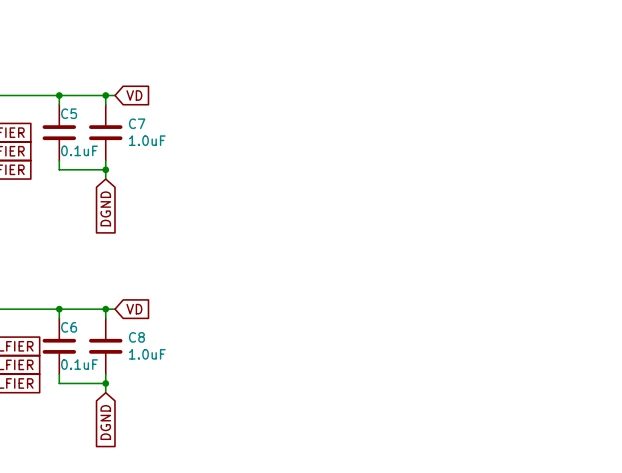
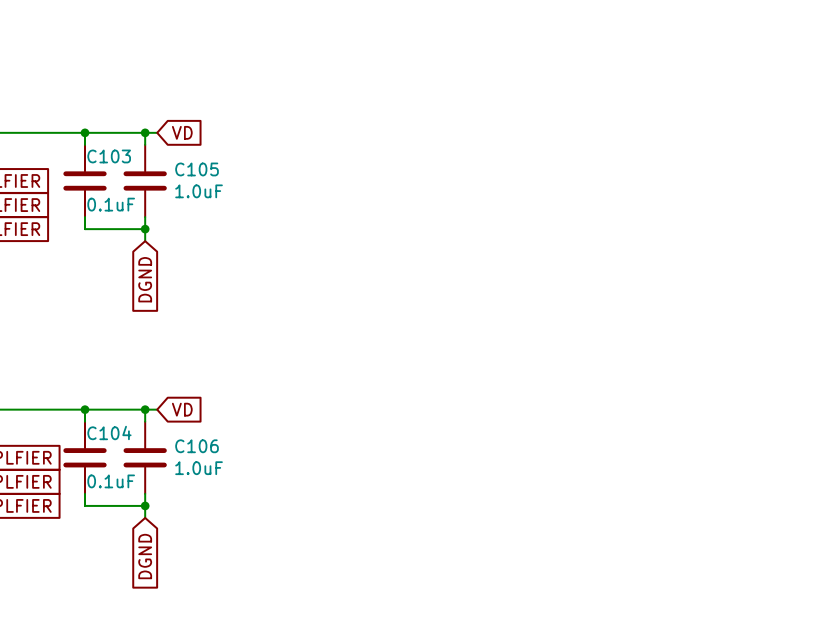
C5 name: C5 (69, 113) -> C103 (109, 156)
C7 name: C7 (137, 123) -> C105 (197, 169)
C6 name: C6 (69, 327) -> C104 (109, 432)
C8 name: C8 (136, 337) -> C106 (197, 446)

